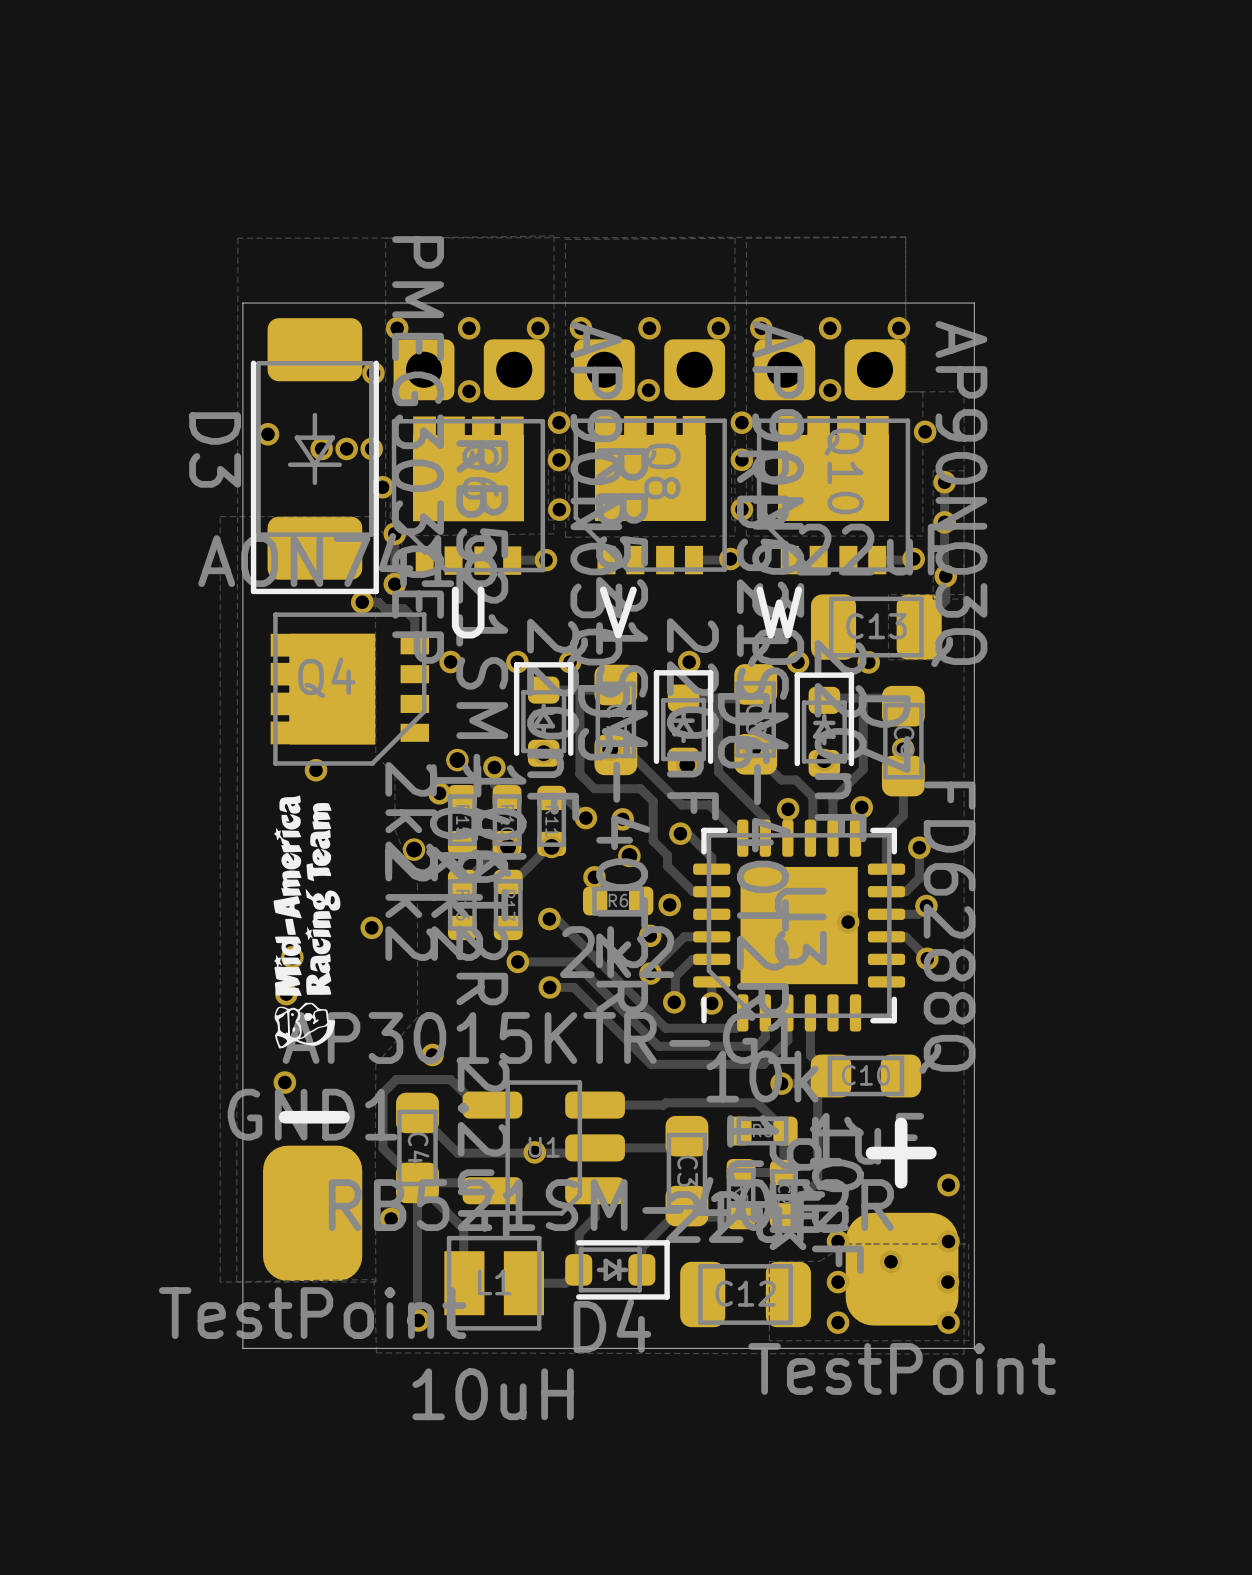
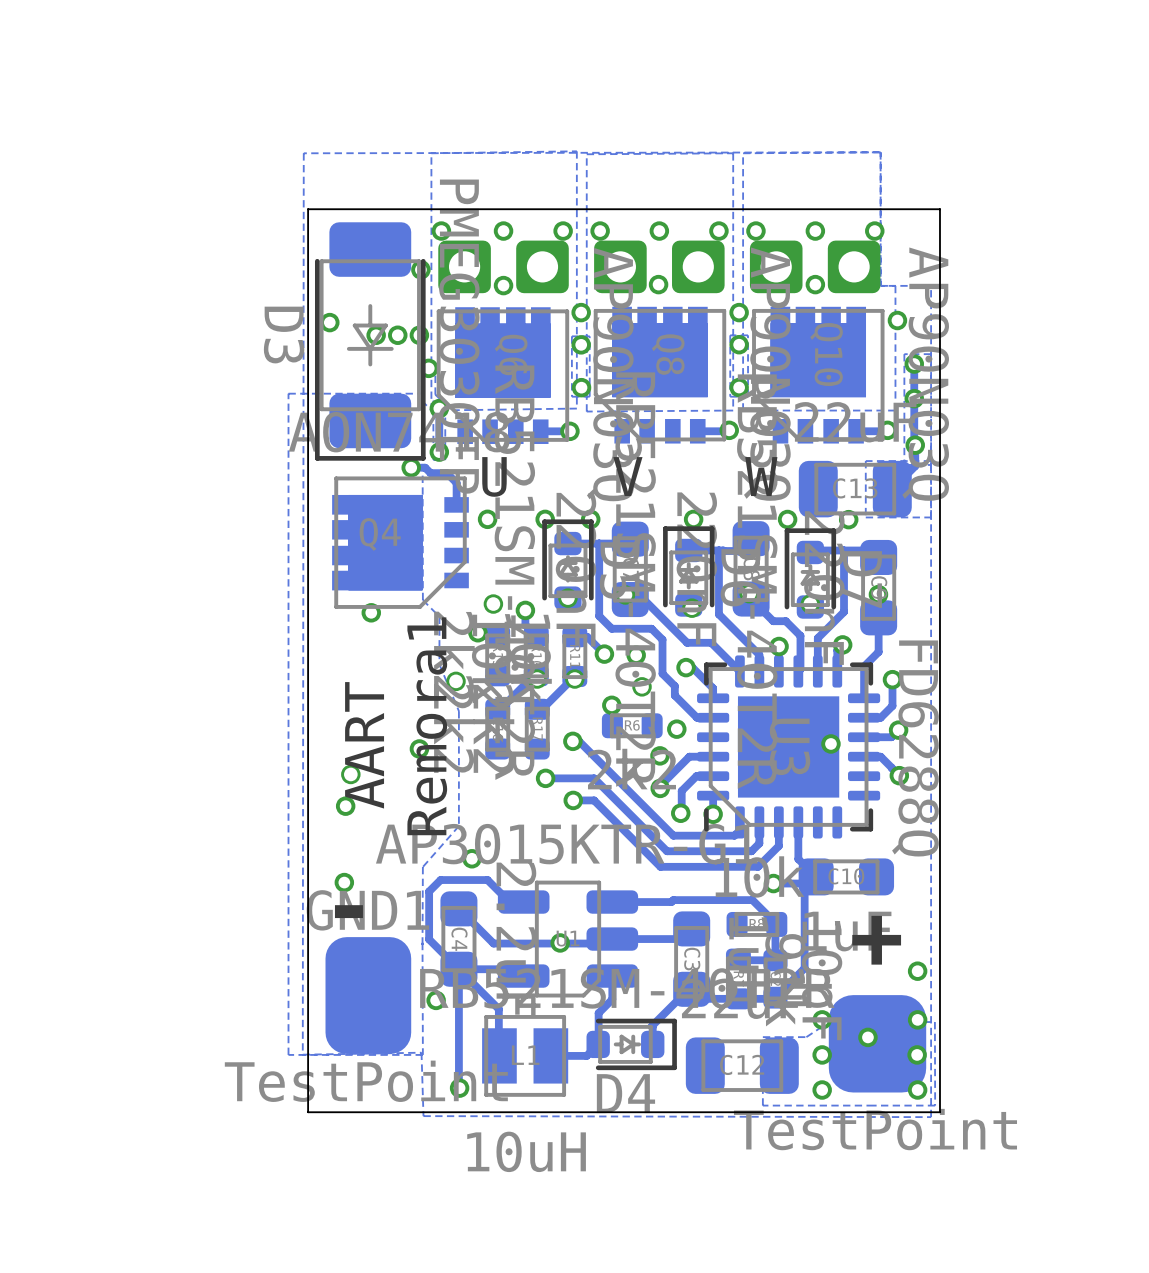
drawing: [273, 795, 341, 1049] -> none
text: none -> AART (364, 745)
text: none -> Remora1 (427, 726)

